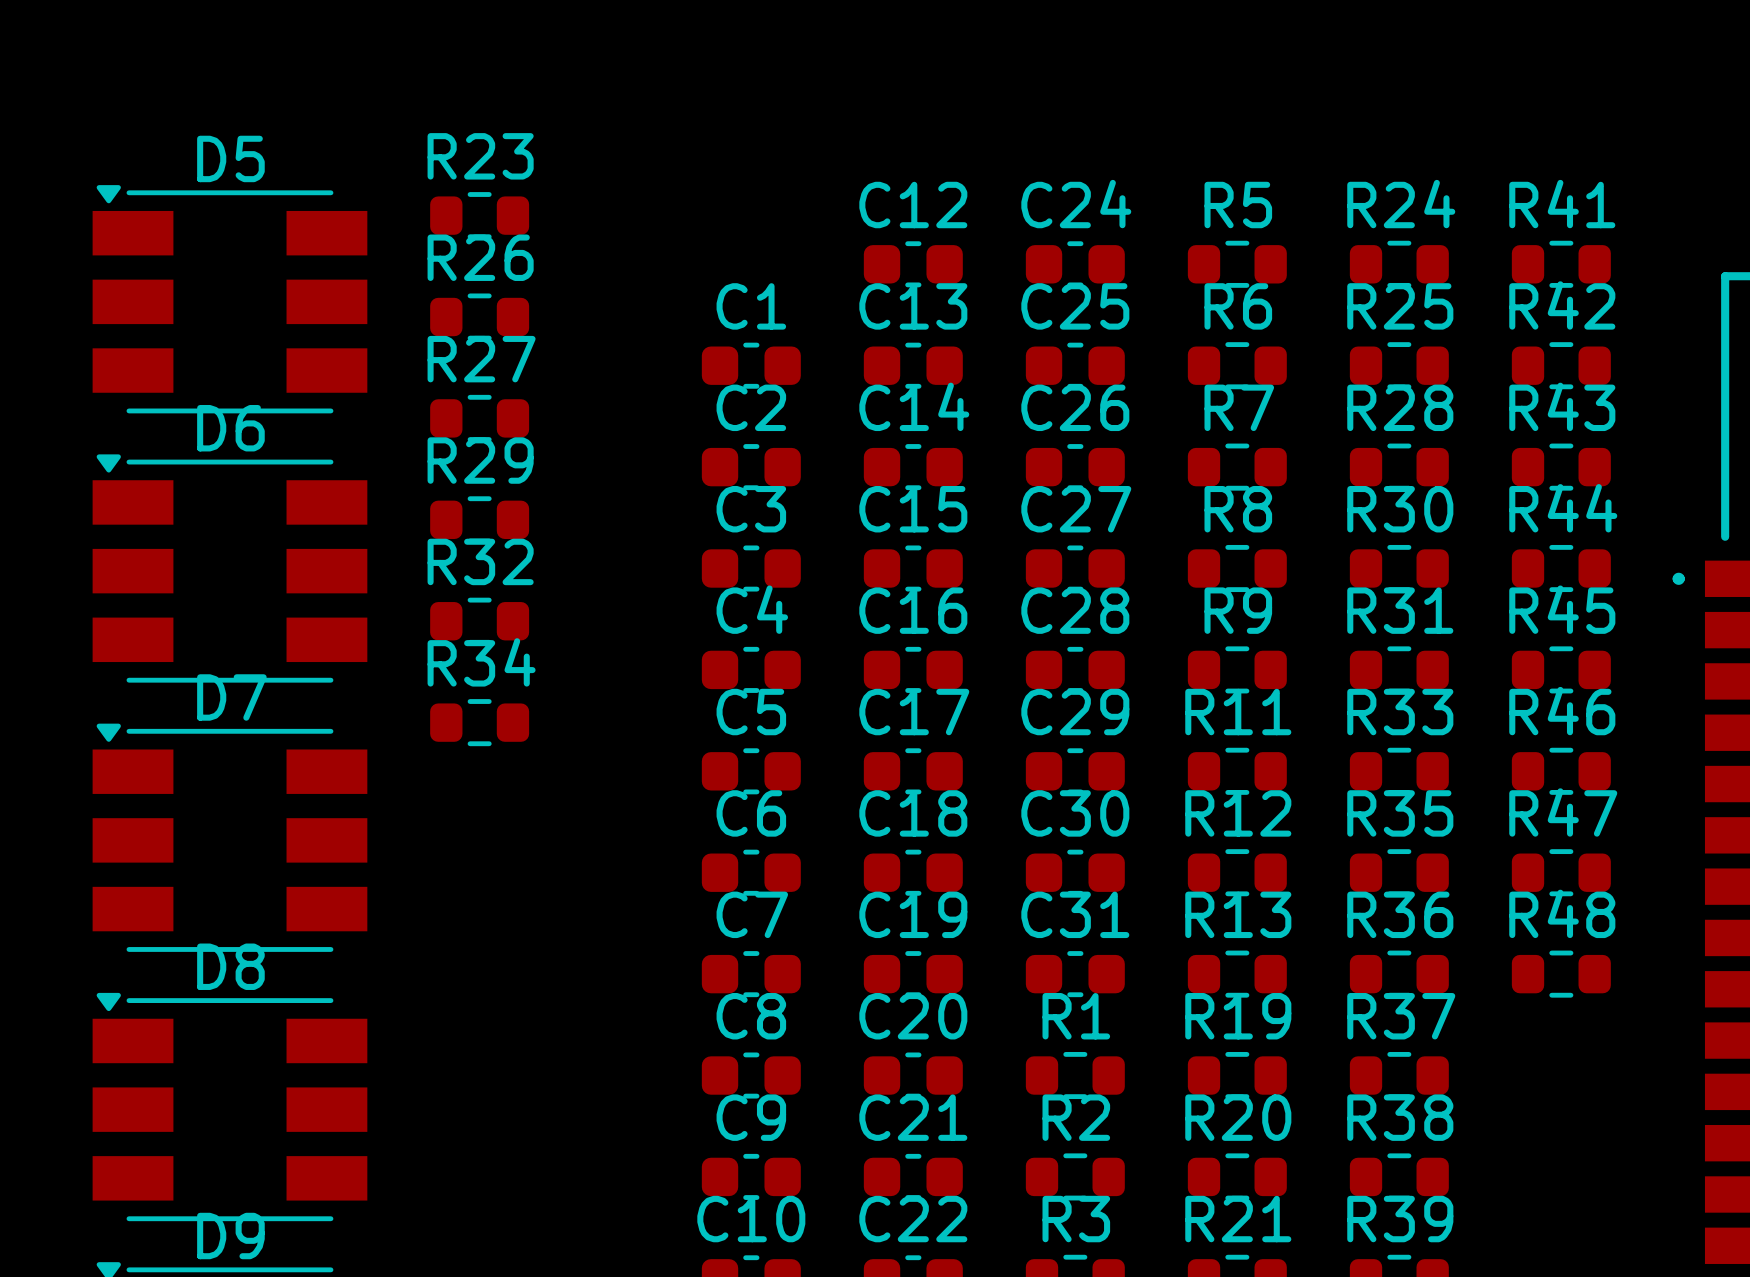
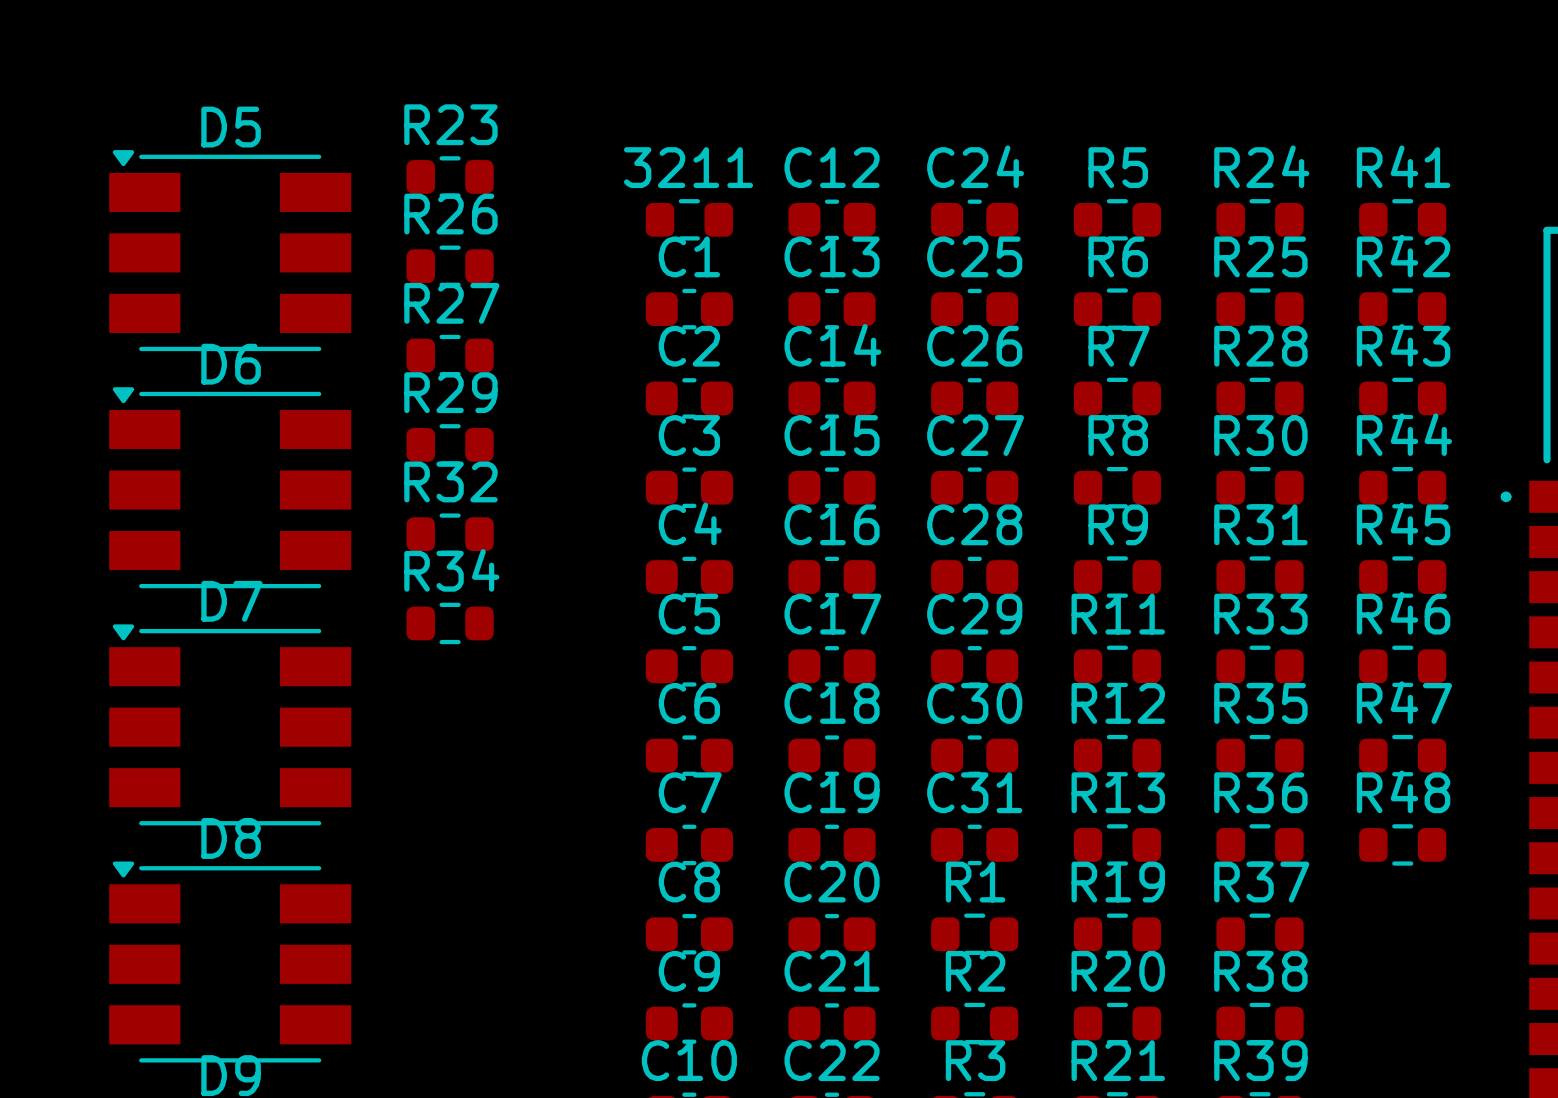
3211: none -> (689, 219)

